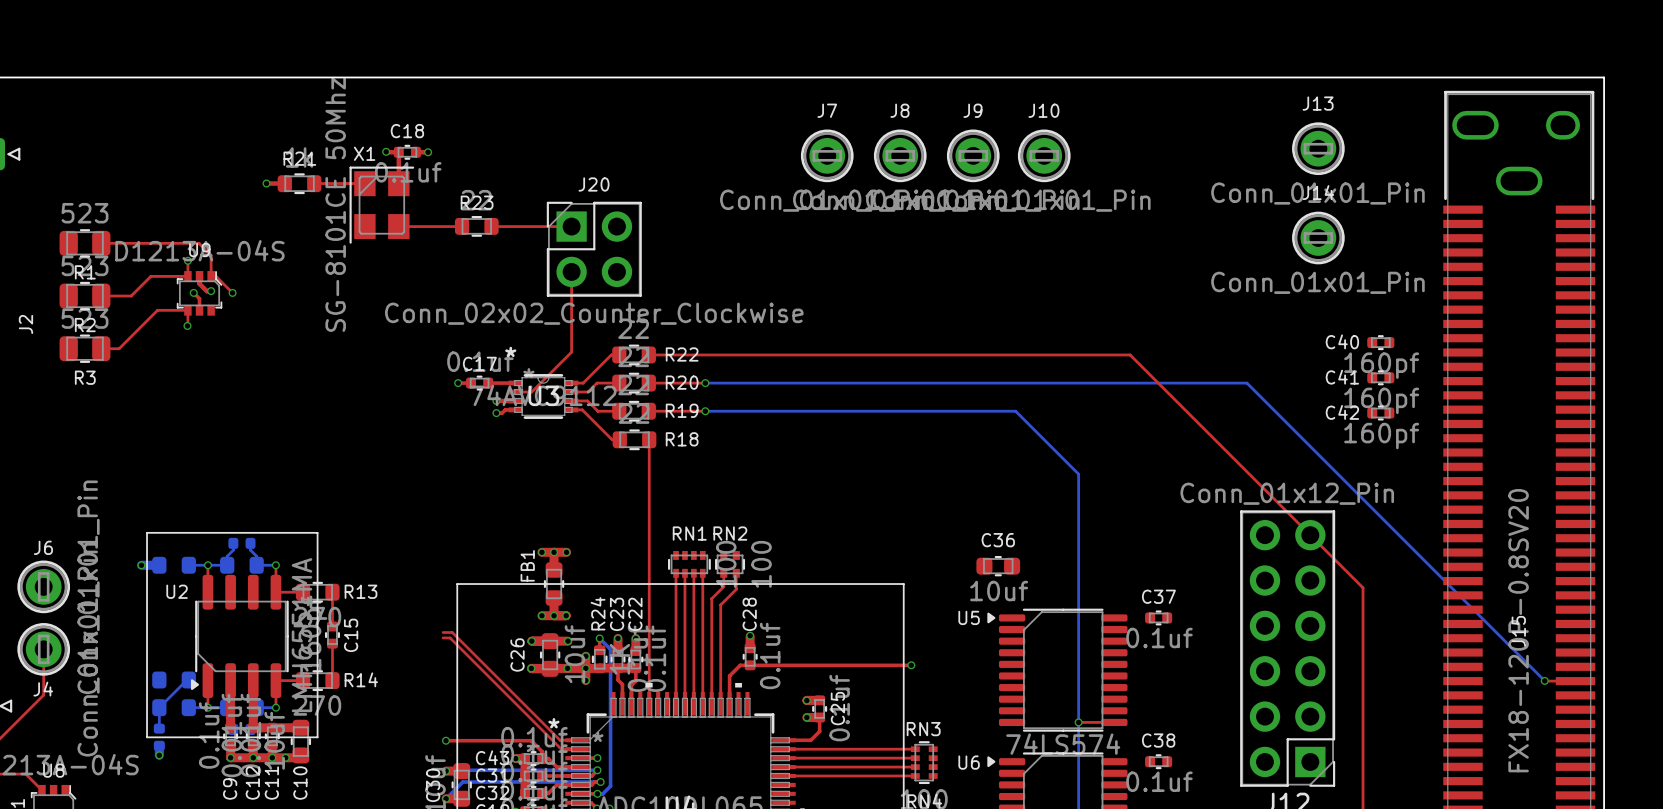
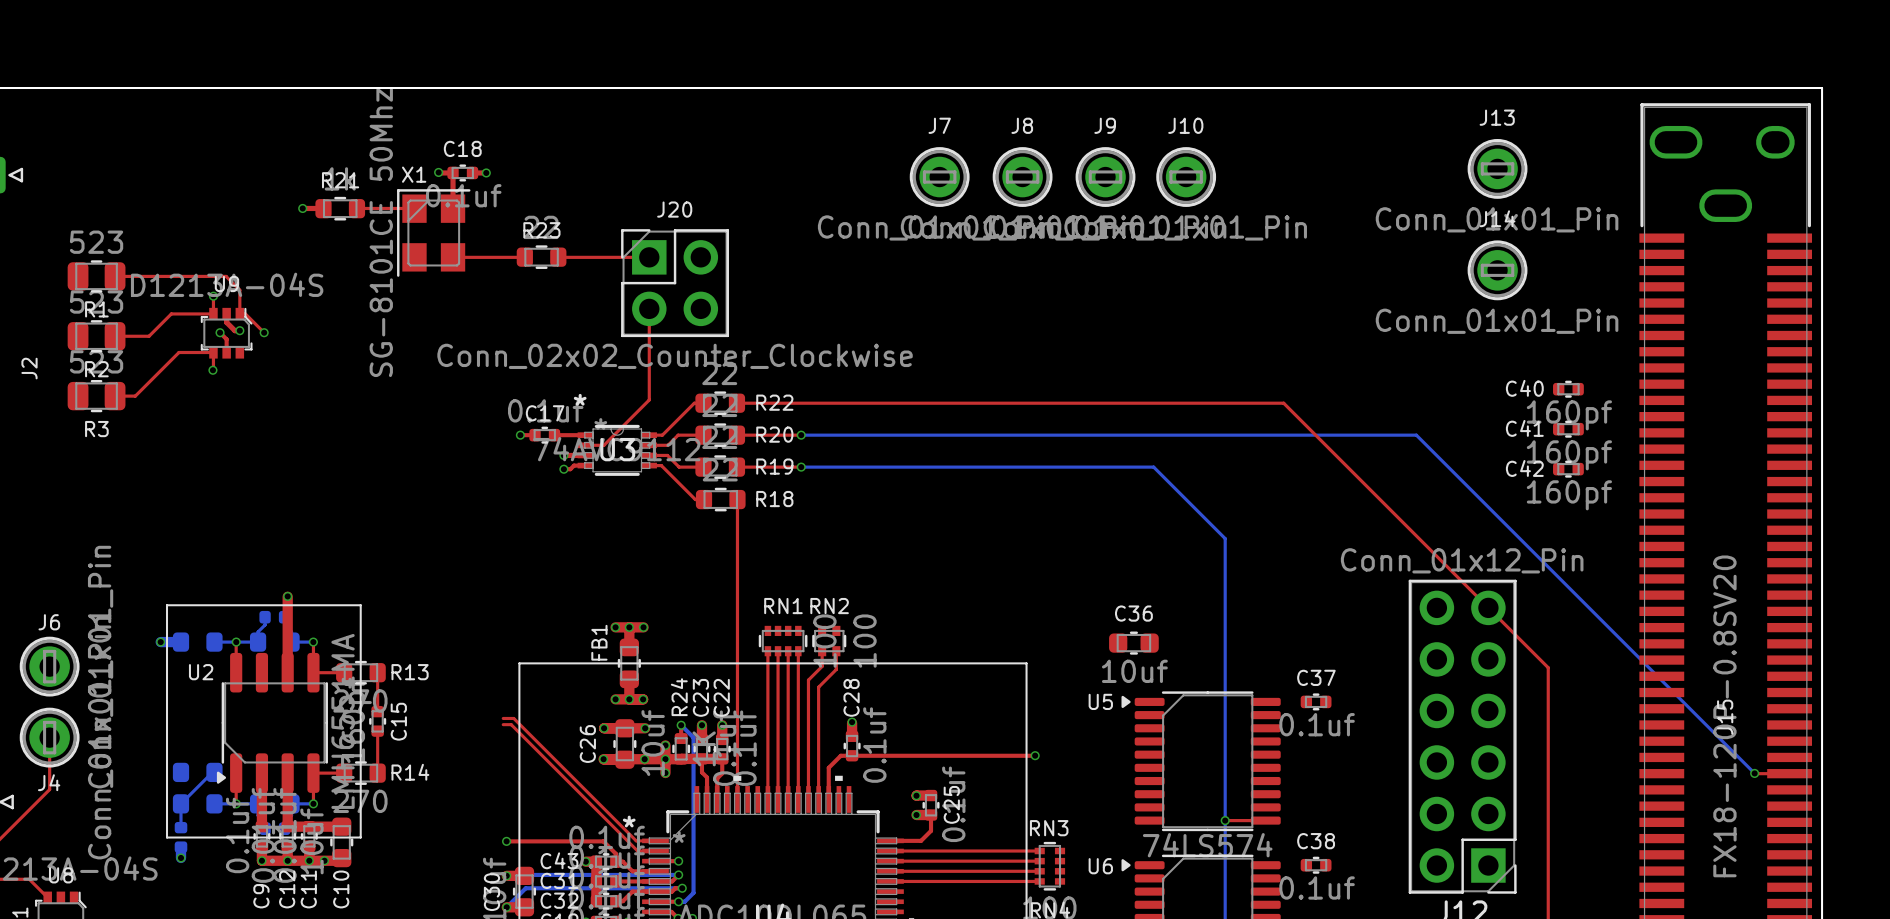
top track: none -> (287, 596) (287, 672)
via: none -> (287, 596)

